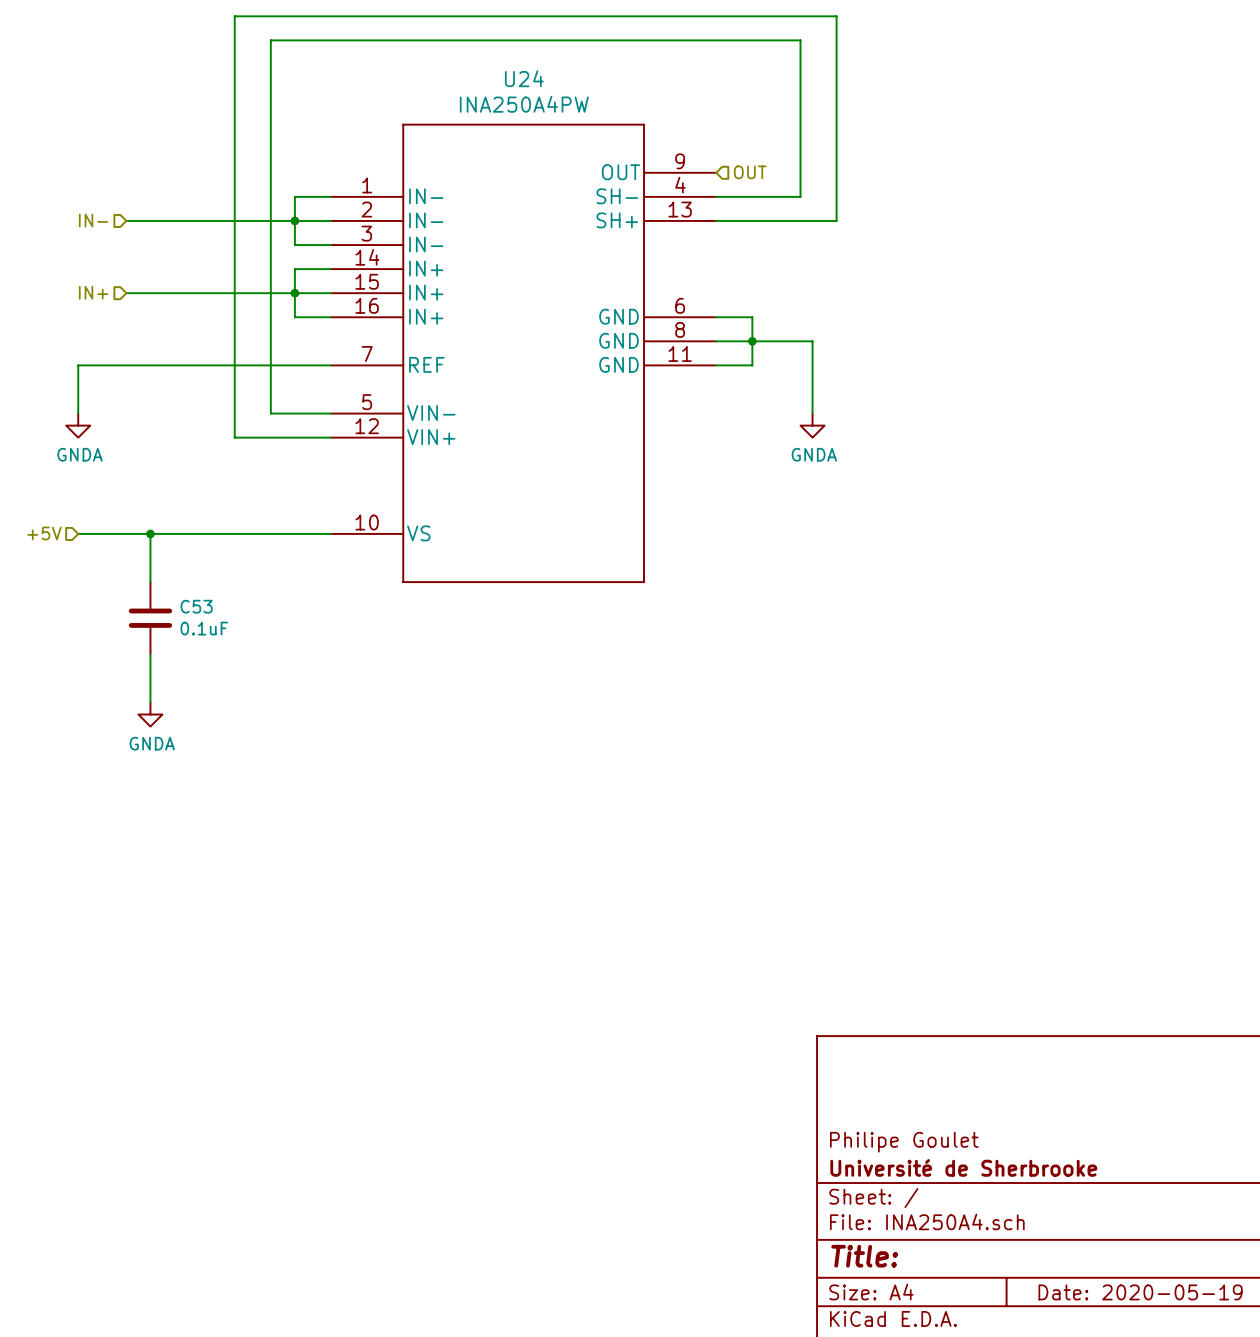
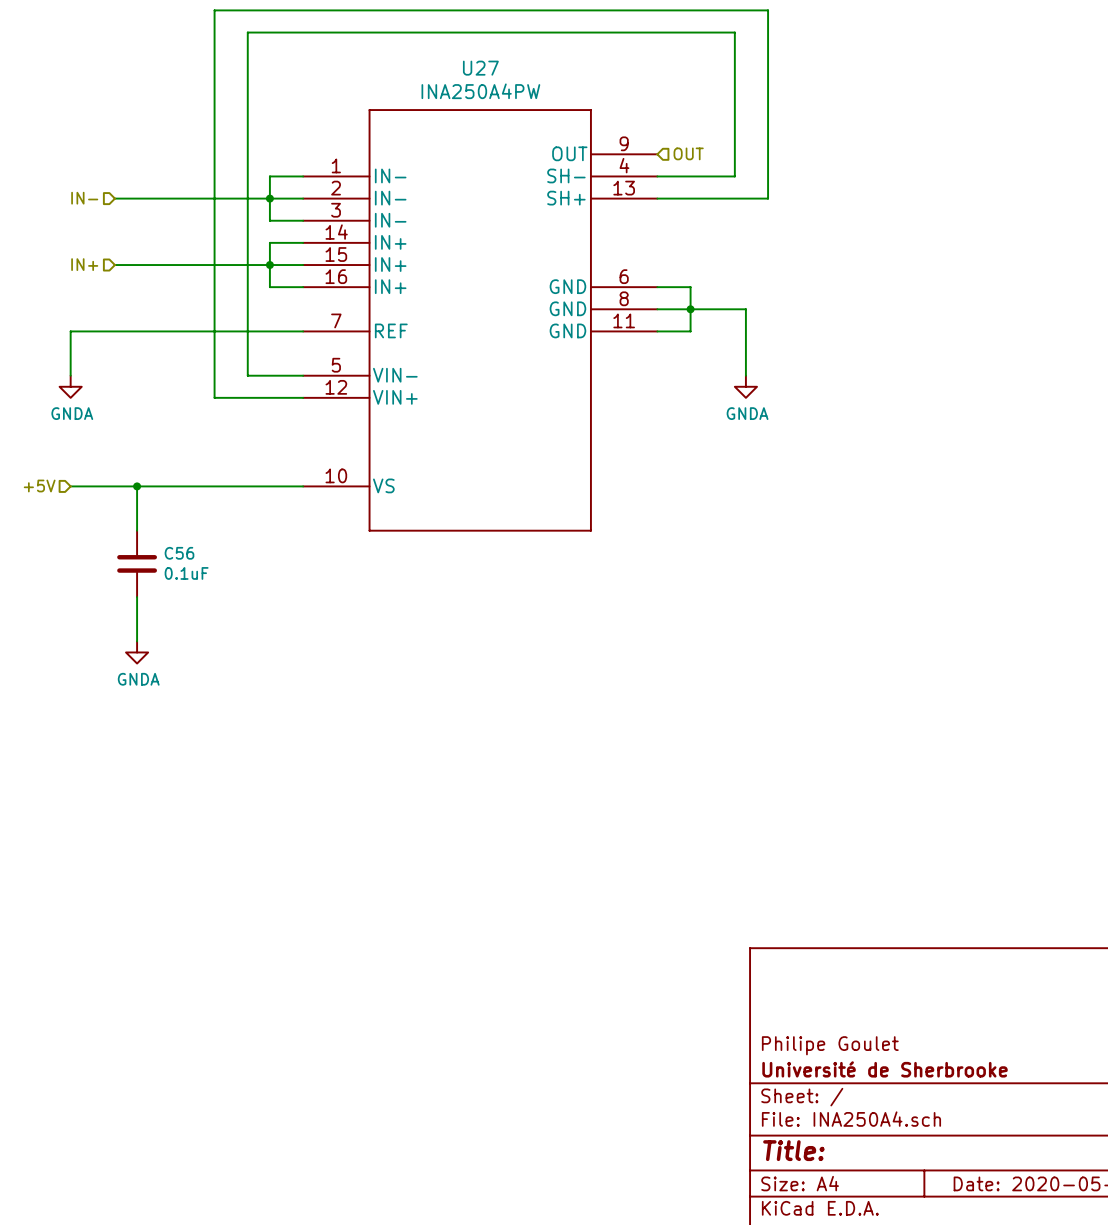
U24 name: U24 (524, 78) -> U27 (480, 68)
C53 name: C53 (196, 606) -> C56 (179, 553)

